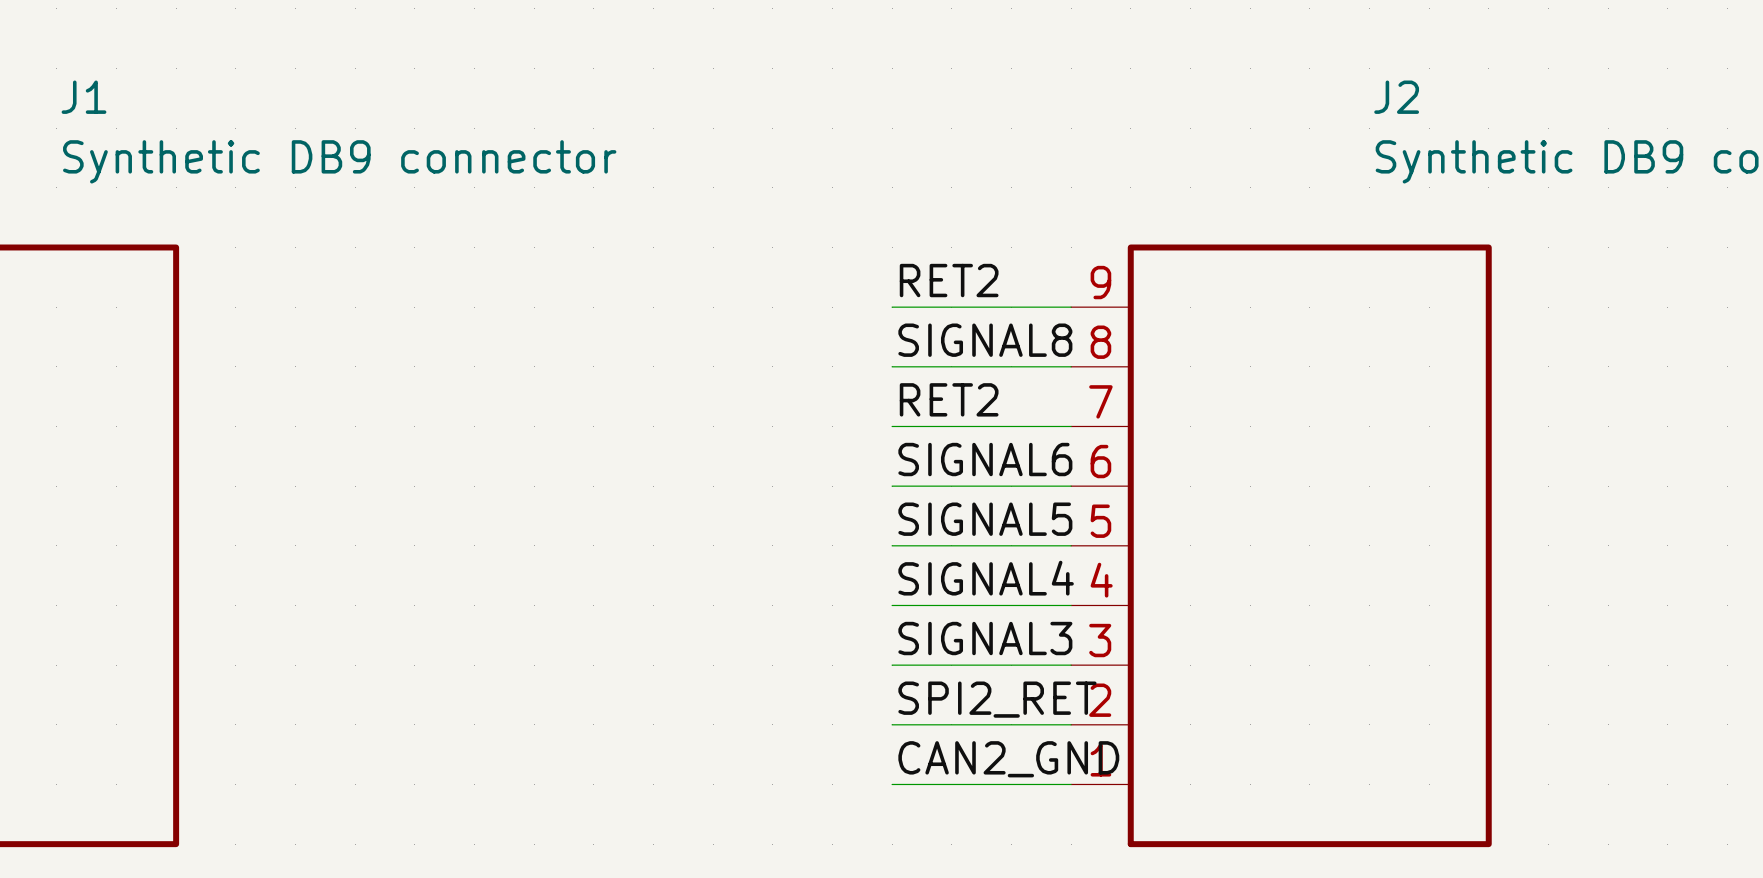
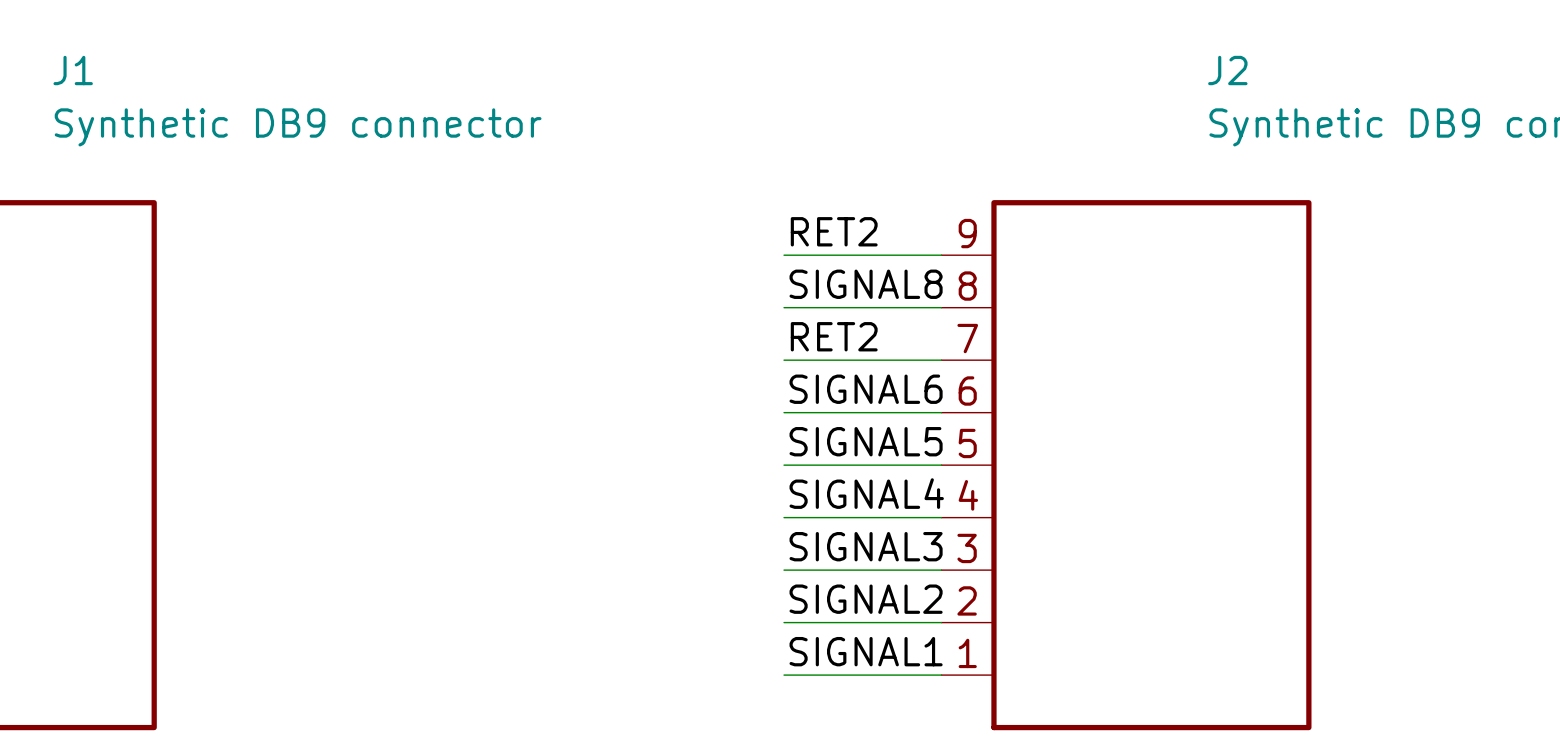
label: SPI2_RET (997, 699) -> SIGNAL2 (866, 599)
label: CAN2_GND (1008, 759) -> SIGNAL1 (866, 651)

